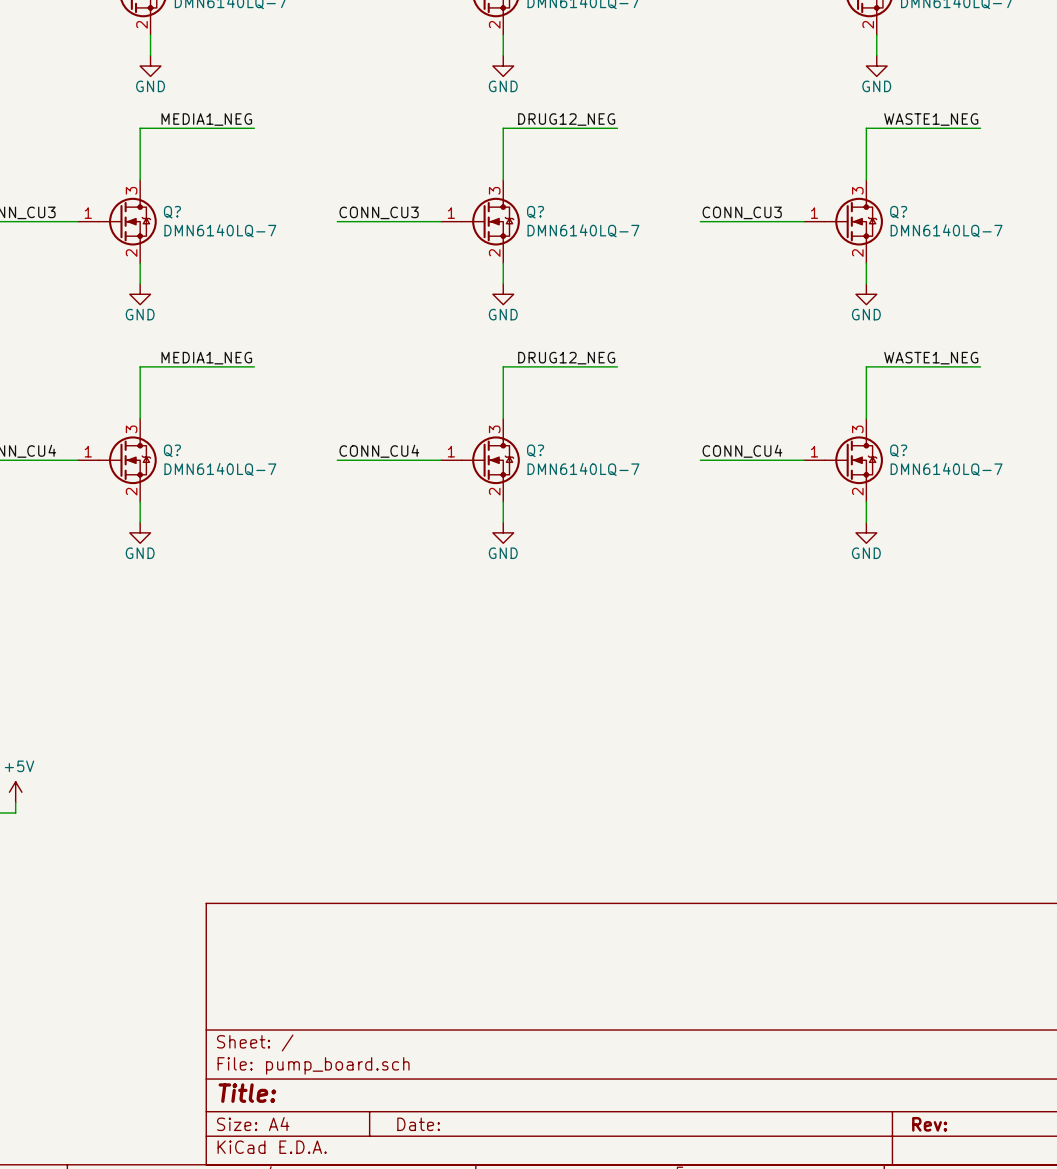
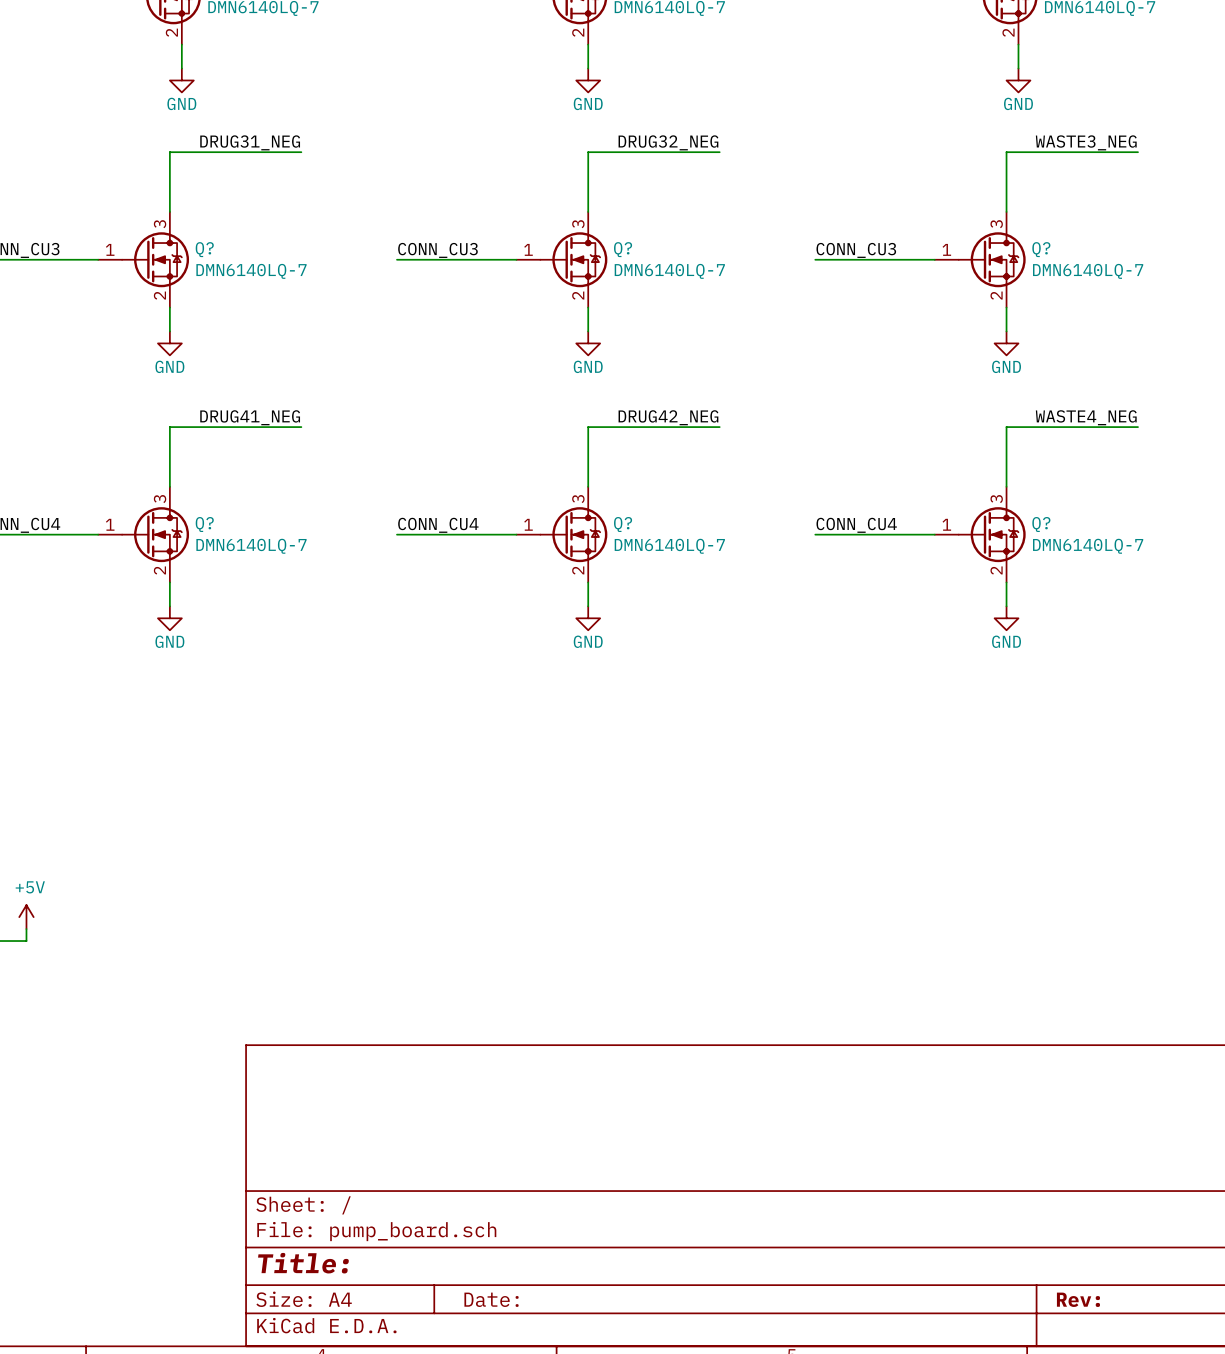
label: MEDIA1_NEG (206, 119) -> DRUG31_NEG (250, 142)
label: DRUG12_NEG (566, 119) -> DRUG32_NEG (668, 142)
label: WASTE1_NEG (931, 119) -> WASTE3_NEG (1086, 142)
label: MEDIA1_NEG (206, 358) -> DRUG41_NEG (250, 417)
label: DRUG12_NEG (566, 358) -> DRUG42_NEG (668, 417)
label: WASTE1_NEG (931, 358) -> WASTE4_NEG (1086, 417)

